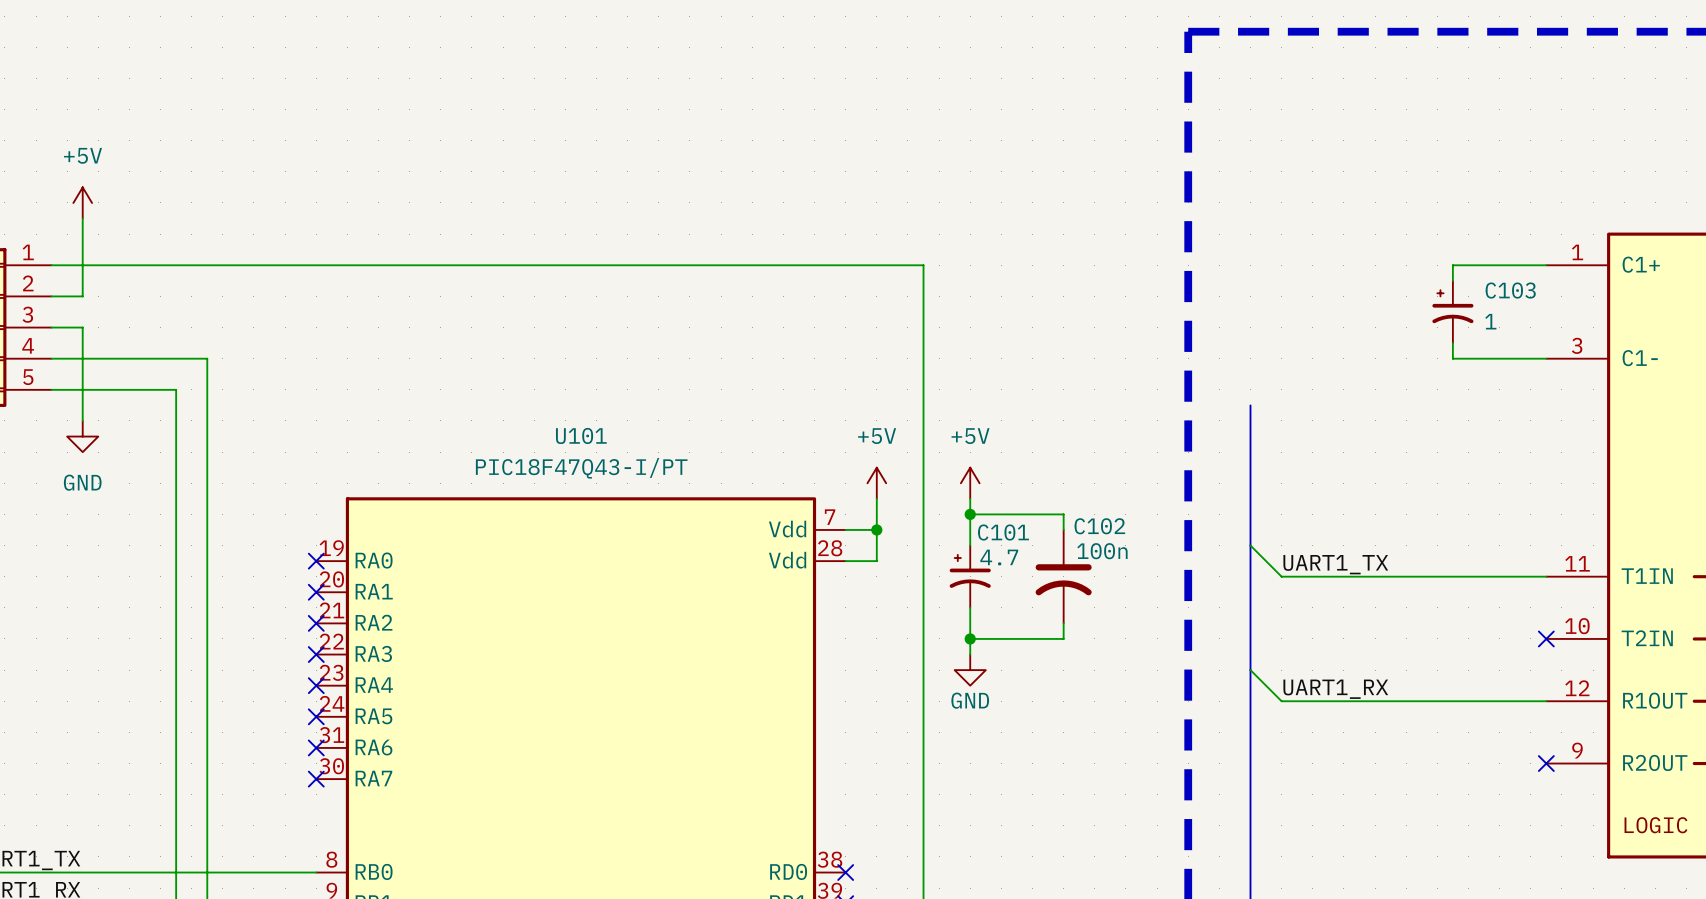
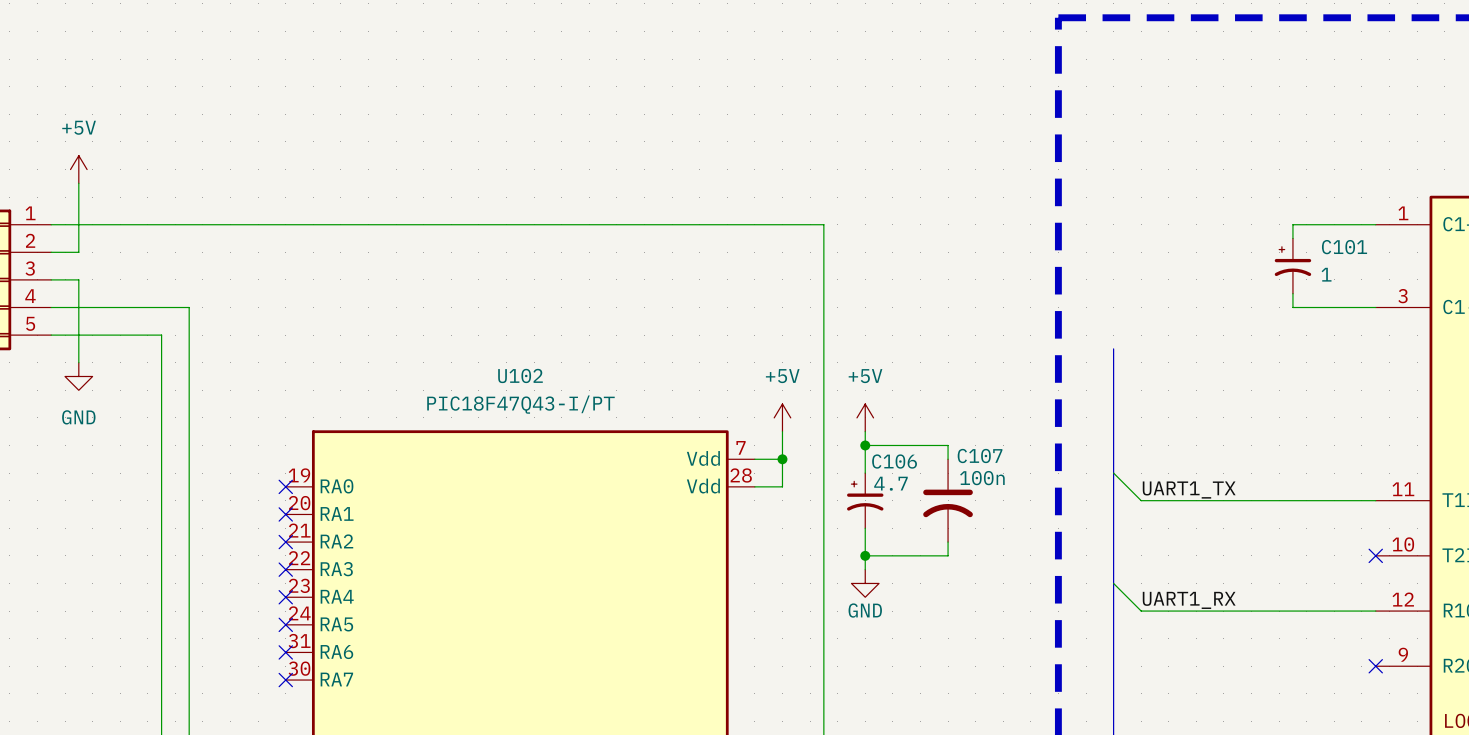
C103 name: C103 (1510, 290) -> C101 (1344, 247)
U101 name: U101 (581, 435) -> U102 (520, 375)
C102 name: C102 (1099, 526) -> C107 (980, 456)
C101 name: C101 (1003, 532) -> C106 (894, 461)

